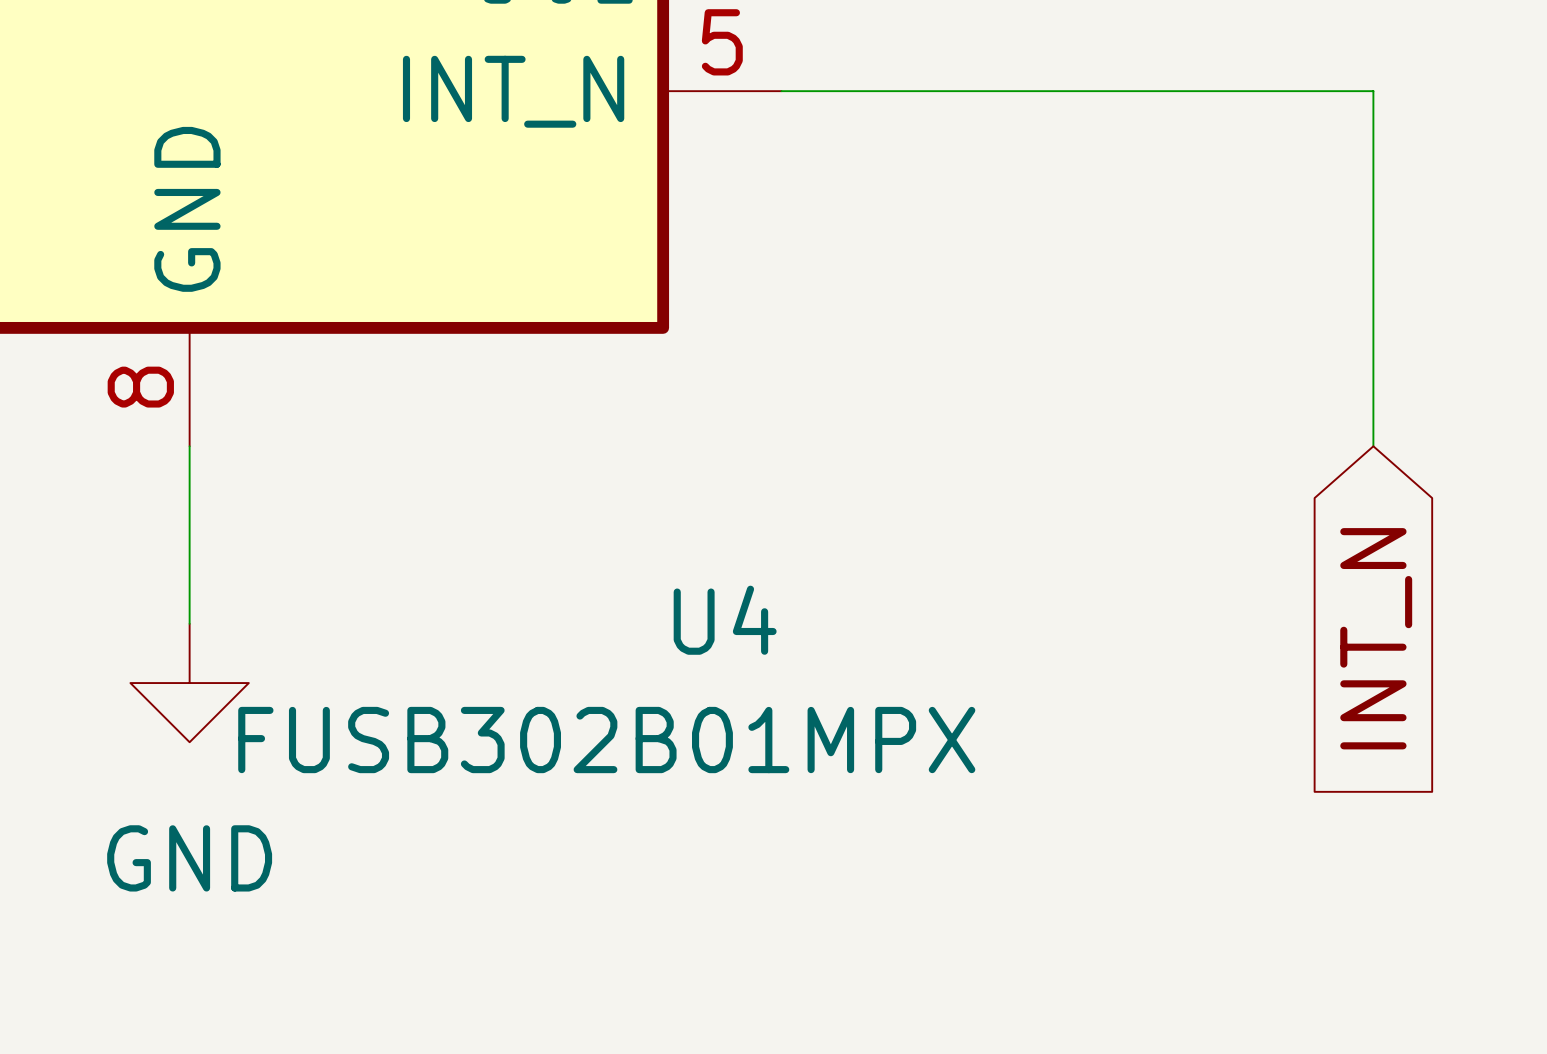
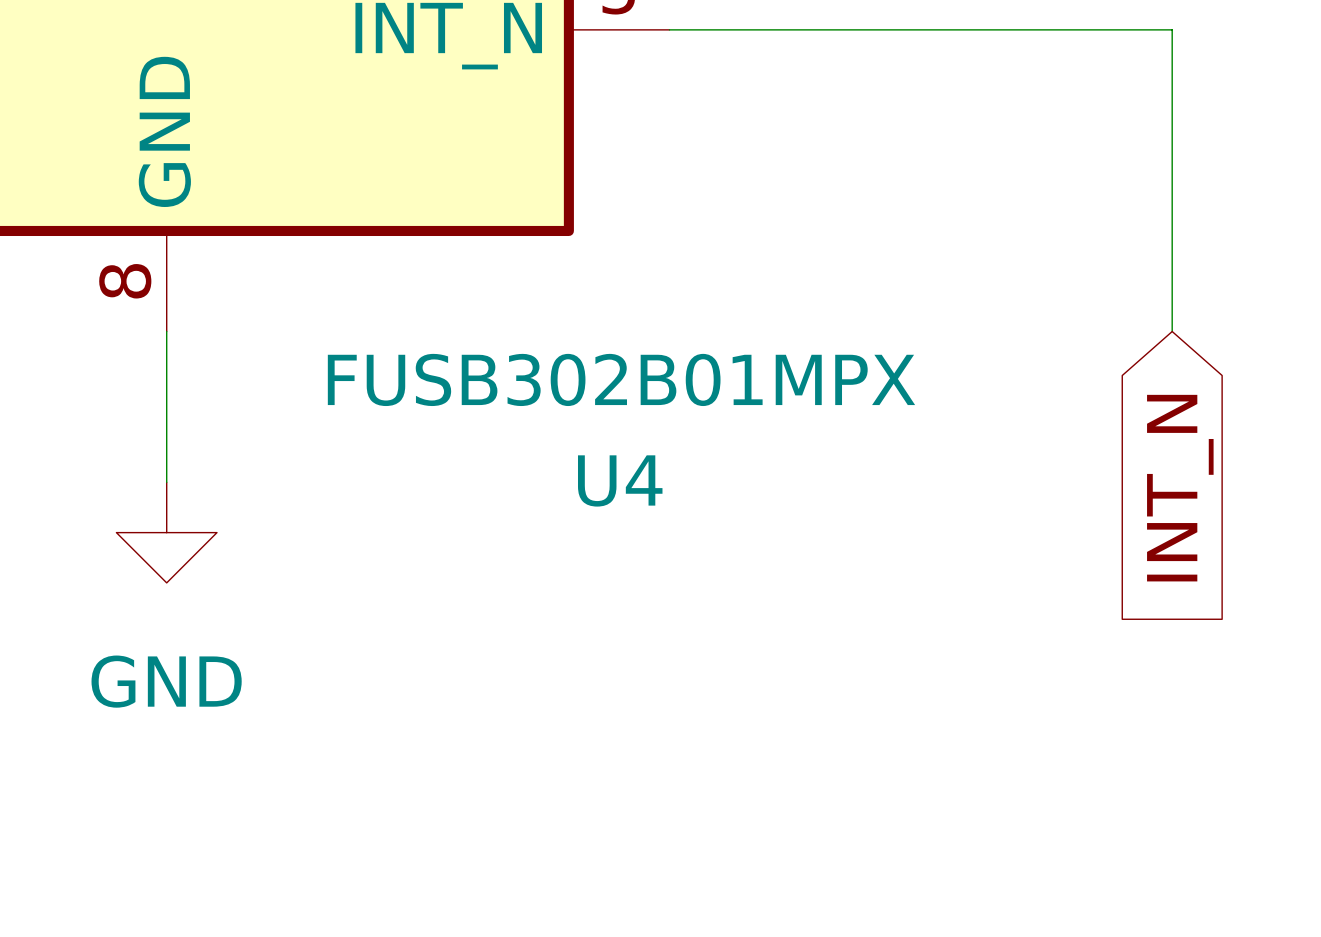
U4 value position: FUSB302B01MPX (606, 740) -> FUSB302B01MPX (621, 379)

